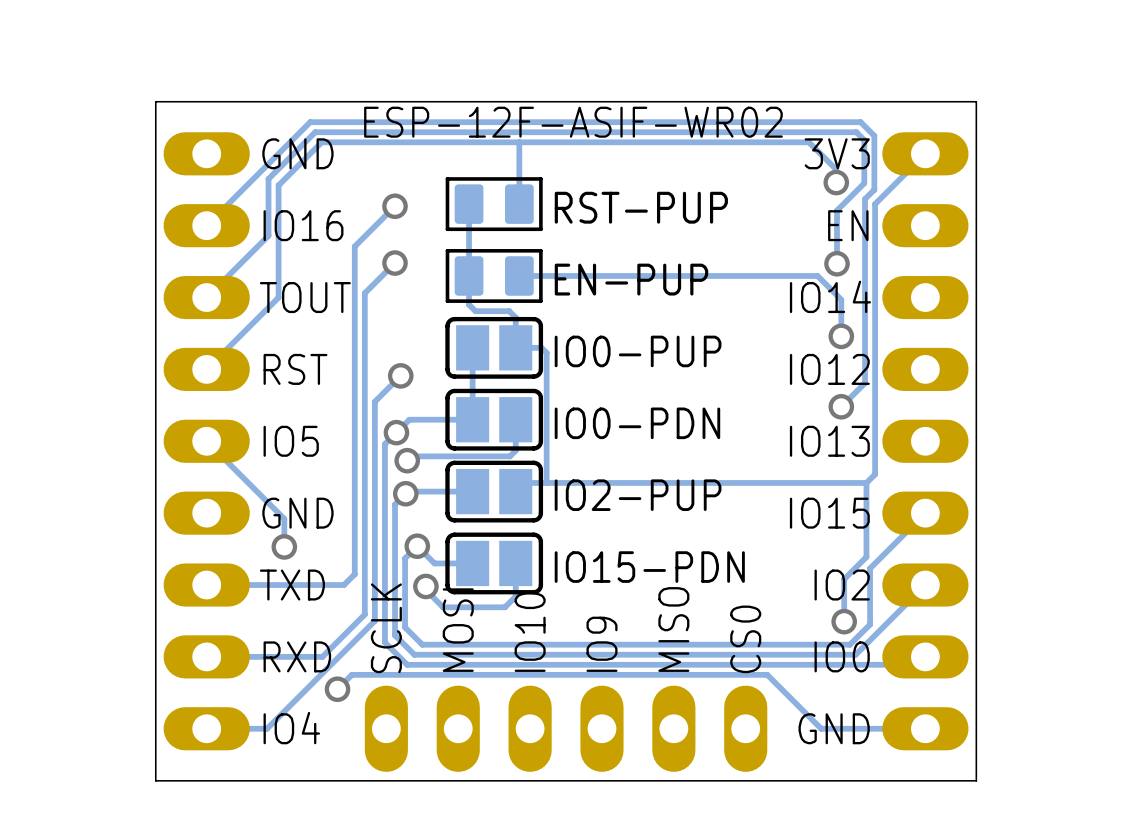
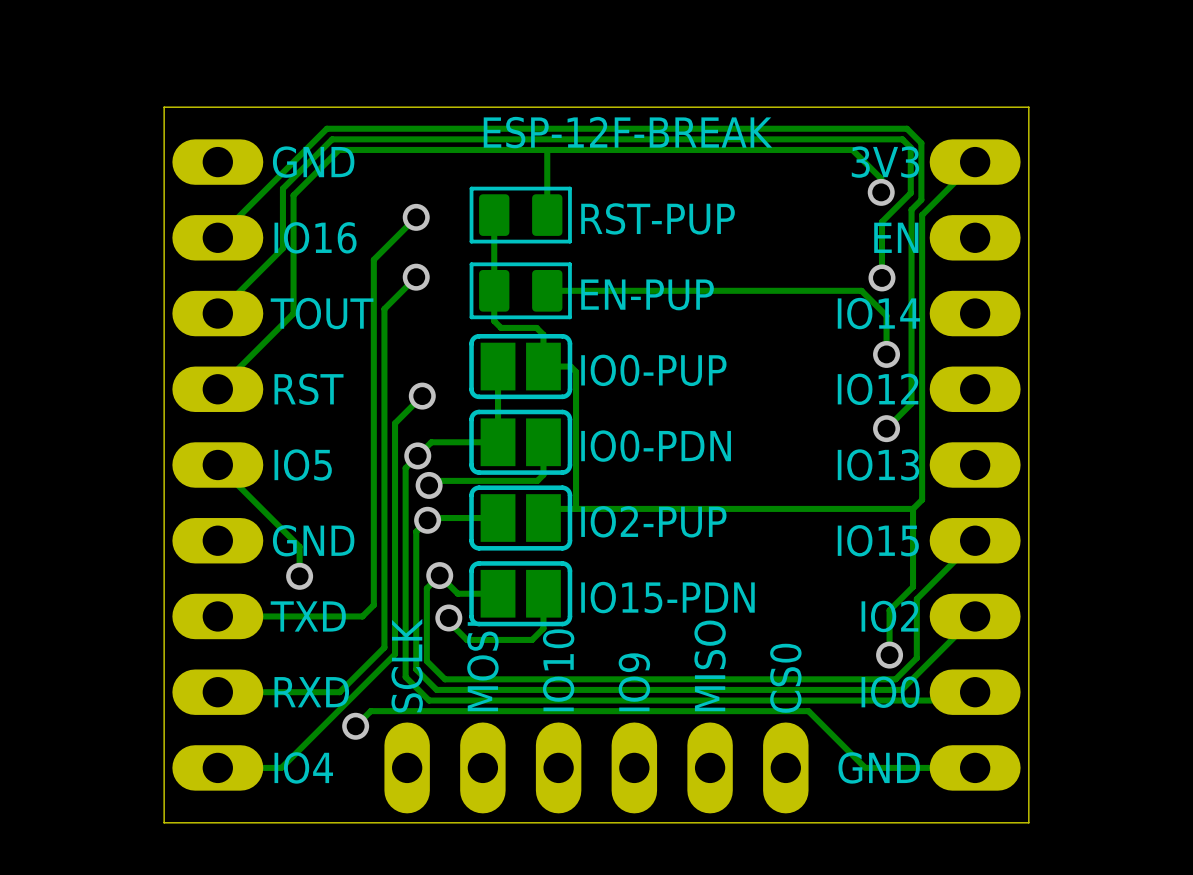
text: ESP-12F-ASIF-WR02 (573, 122) -> none
text: none -> ESP-12F-BREAK (627, 132)

